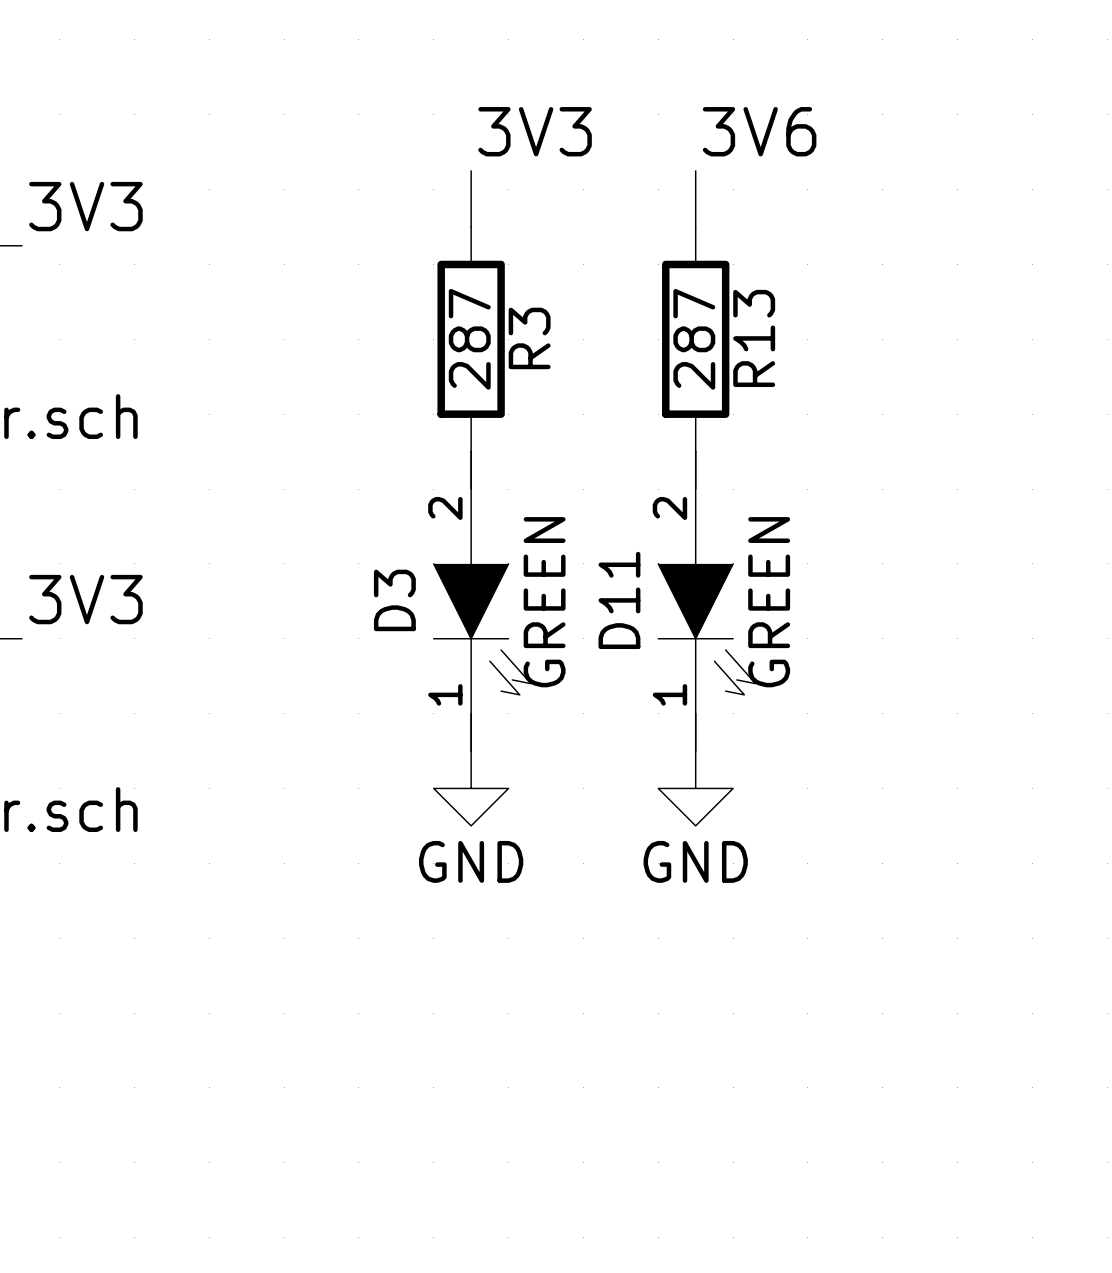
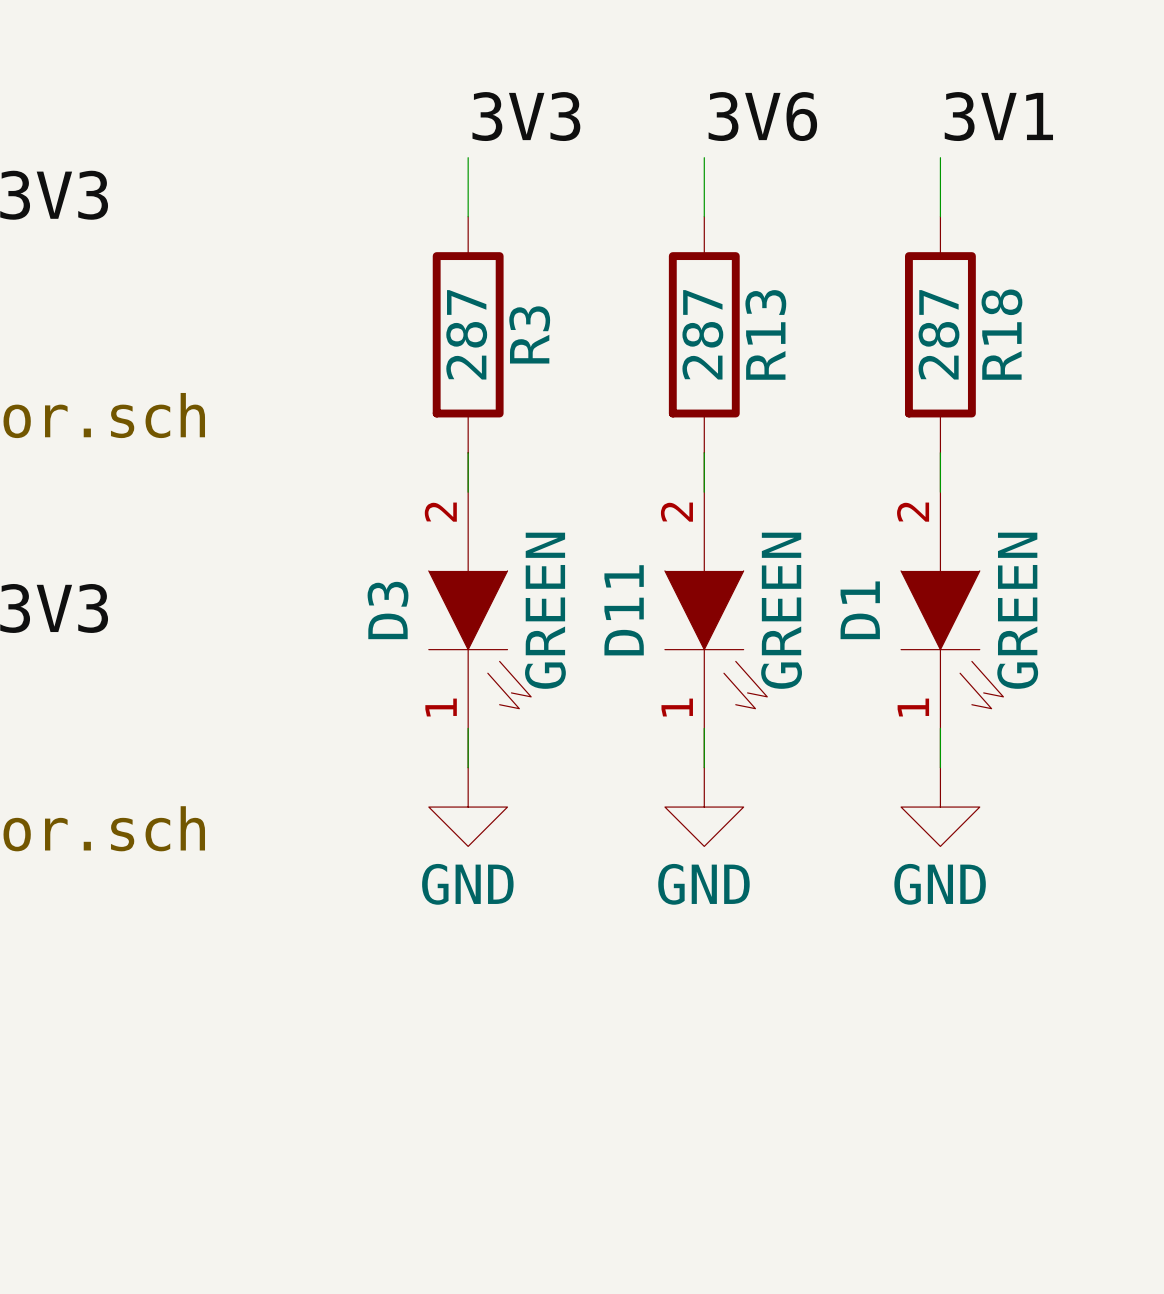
label: none -> 3V1 (998, 116)
wire: none -> (940, 157) (940, 216)
R18: none -> 287 (940, 334)
wire: none -> (940, 452) (940, 492)
D1: none -> GREEN (952, 610)
wire: none -> (940, 728) (940, 767)
power symbol: none -> GND (940, 807)

